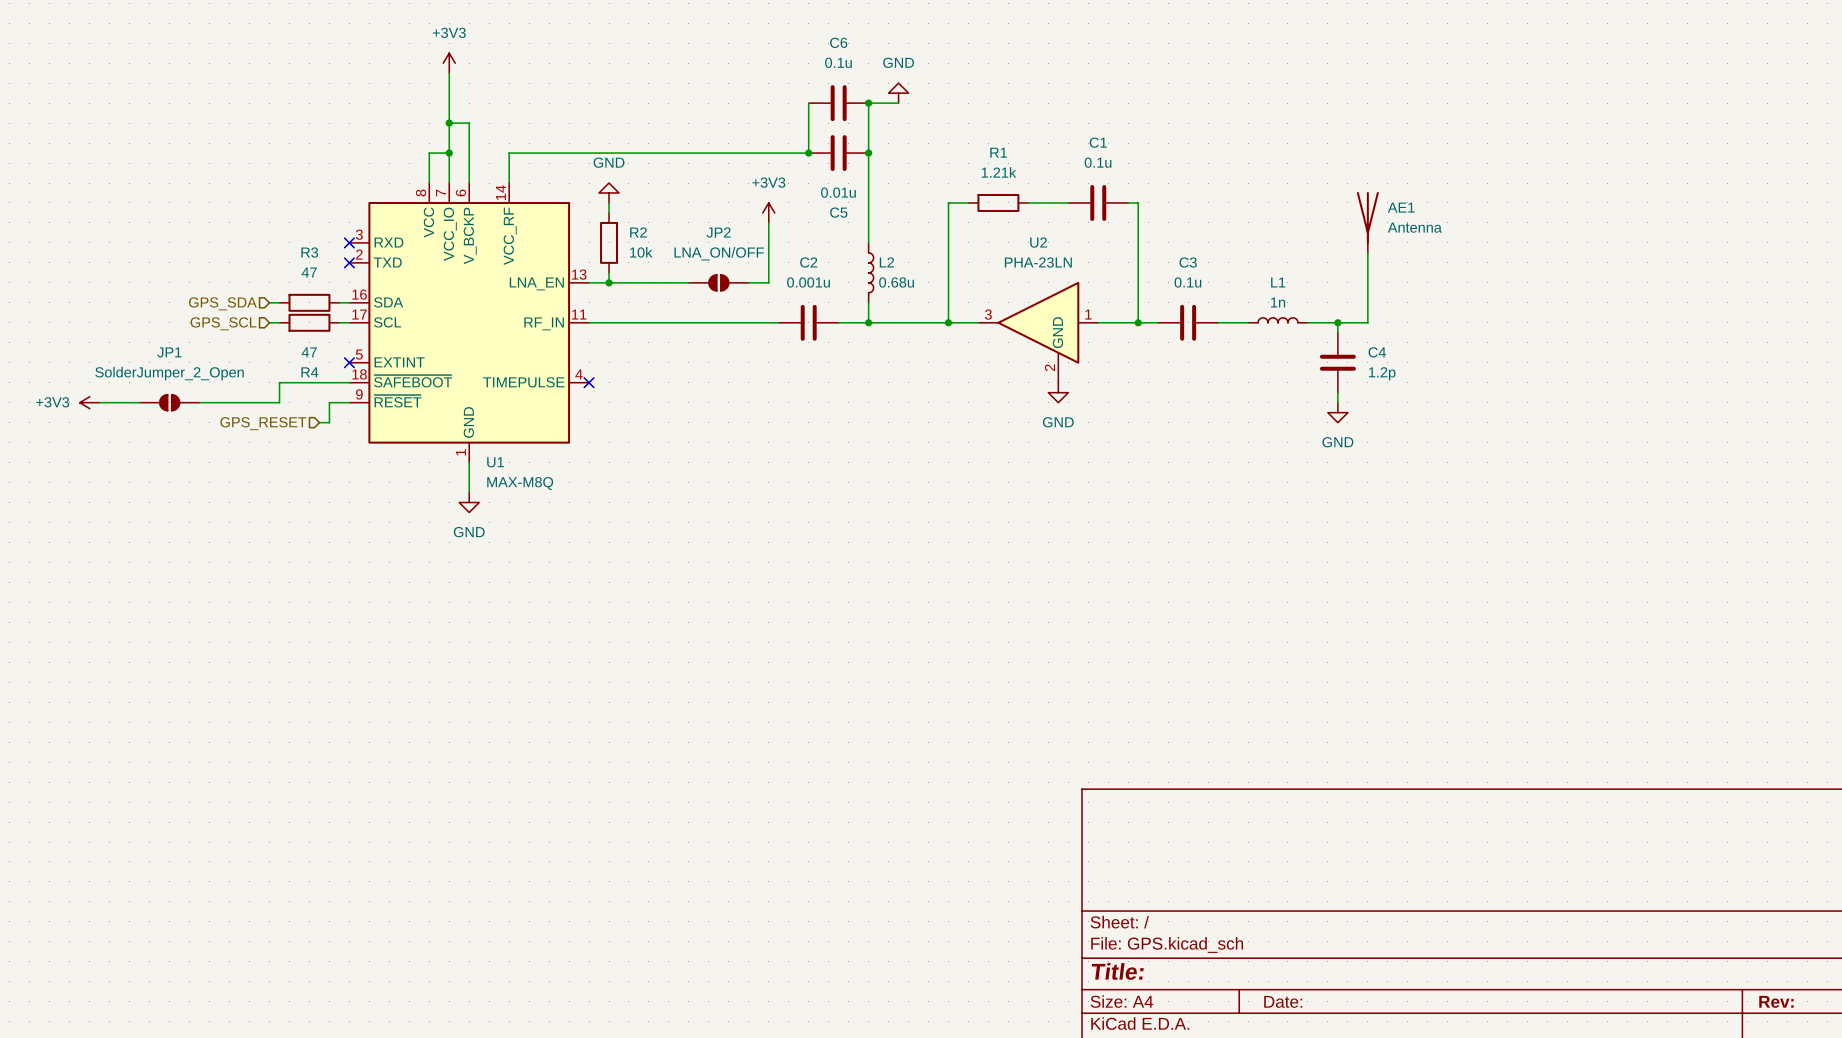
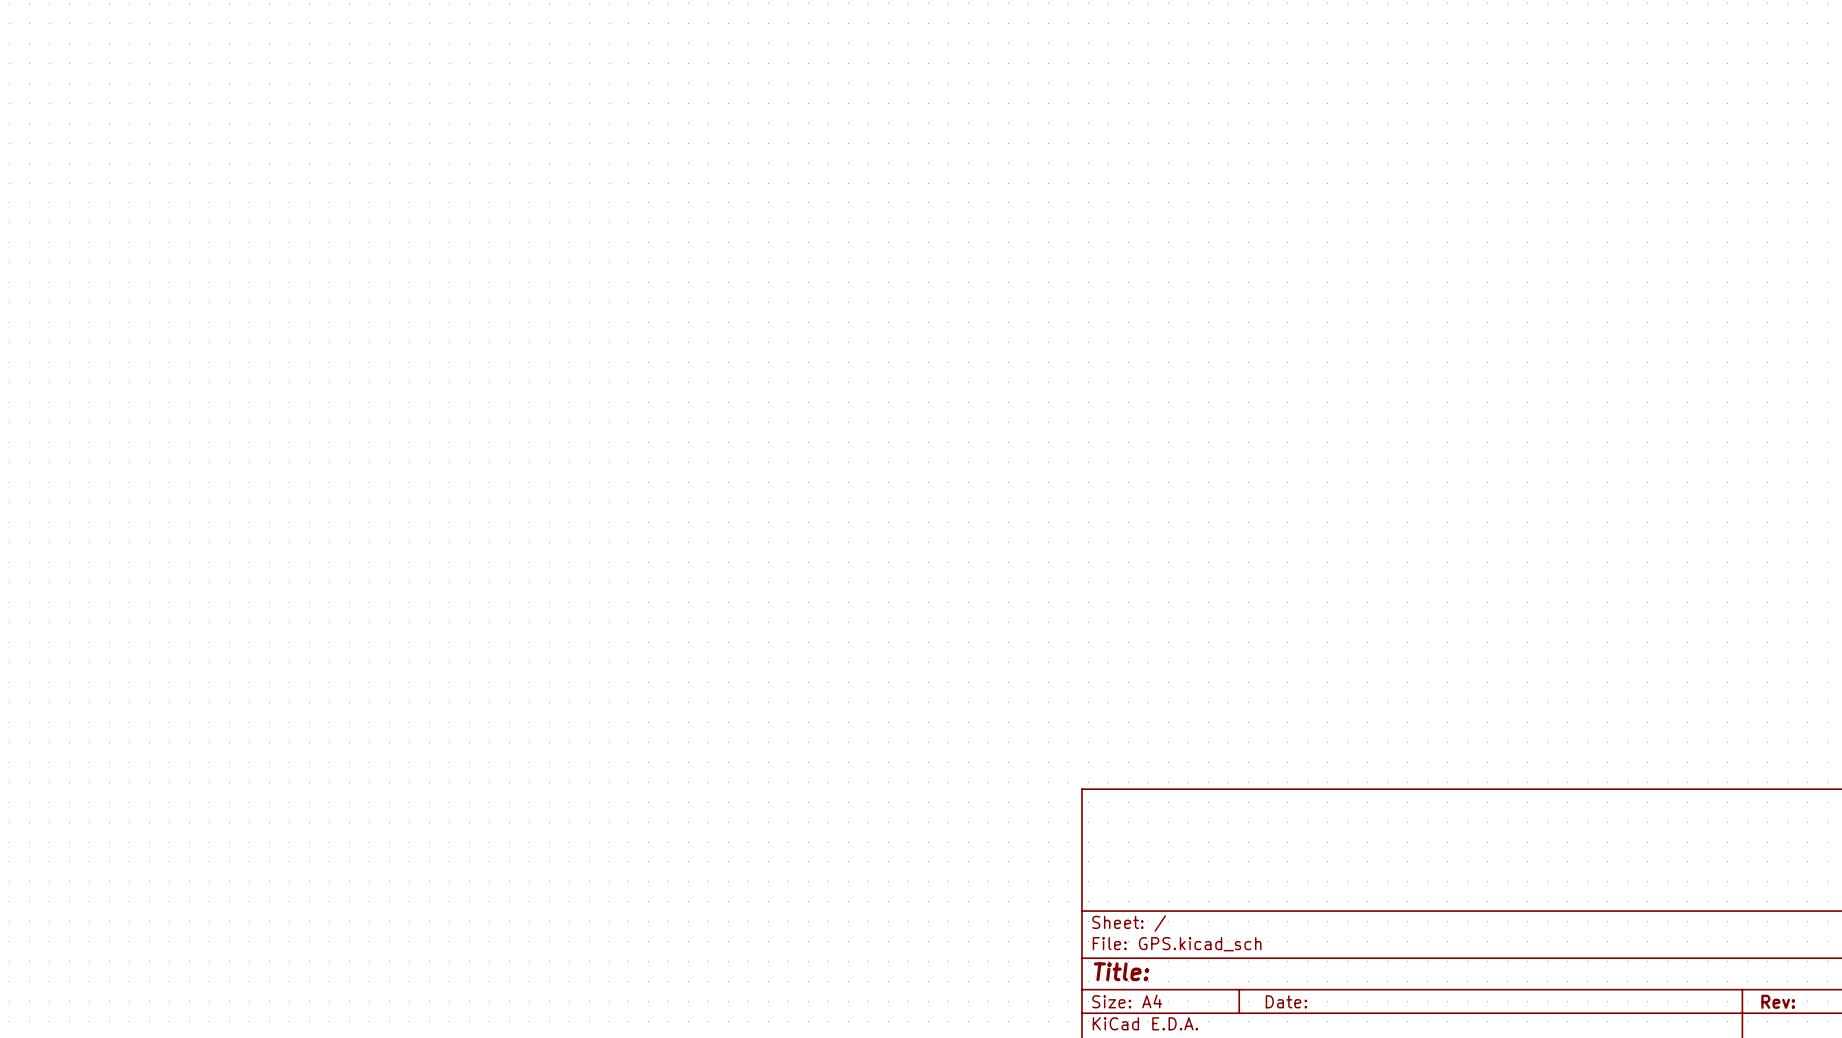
power symbol: +3V3 (449, 63) -> none
wire: (449, 73) (449, 183) -> none
power symbol: GND (898, 93) -> none
wire: (808, 103) (808, 153) (509, 153) (509, 183) -> none
C6: 0.1u (838, 103) -> none
junction: (868, 103) -> none
wire: (898, 103) (868, 103) (868, 242) -> none
wire: (449, 123) (469, 123) (469, 183) -> none
junction: (449, 123) -> none
wire: (449, 153) (429, 153) (429, 183) -> none
junction: (449, 153) -> none
junction: (808, 153) -> none
C5: 0.01u (838, 153) -> none
junction: (868, 153) -> none
power symbol: GND (609, 192) -> none
wire: (609, 202) (609, 212) -> none
wire: (968, 202) (948, 202) (948, 322) -> none
R1: 1.21k (998, 202) -> none
wire: (1028, 202) (1068, 202) -> none
C1: 0.1u (1098, 202) -> none
wire: (1128, 202) (1138, 202) (1138, 322) -> none
power symbol: +3V3 (768, 212) -> none
wire: (768, 222) (768, 282) (748, 282) -> none
AE1: Antenna (1367, 222) -> none
no-connect mark: (349, 242) -> none
R2: 10k (609, 242) -> none
wire: (1367, 252) (1367, 322) (1307, 322) -> none
no-connect mark: (349, 262) -> none
wire: (609, 272) (609, 282) -> none
L2: 0.68u (871, 272) -> none
wire: (589, 282) (688, 282) -> none
junction: (609, 282) -> none
JP2: LNA_ON/OFF (718, 282) -> none
wire: (269, 302) (279, 302) -> none
R3: 47 (309, 302) -> none
wire: (339, 302) (349, 302) -> none
wire: (868, 302) (868, 322) -> none
hierarchical label: GPS_SDA (222, 303) -> none
L1: 1n (1277, 320) -> none
wire: (269, 322) (279, 322) -> none
R4: 47 (309, 322) -> none
wire: (339, 322) (349, 322) -> none
U1: MAX-M8Q (469, 322) -> none
wire: (589, 322) (778, 322) -> none
C2: 0.001u (808, 322) -> none
wire: (838, 322) (978, 322) -> none
junction: (868, 322) -> none
junction: (948, 322) -> none
wire: (1098, 322) (1158, 322) -> none
junction: (1138, 322) -> none
C3: 0.1u (1188, 322) -> none
wire: (1218, 322) (1248, 322) -> none
wire: (1337, 322) (1337, 332) -> none
junction: (1337, 322) -> none
hierarchical label: GPS_SCL (223, 323) -> none
U2: PHA-23LN (1038, 332) -> none
no-connect mark: (349, 362) -> none
C4: 1.2p (1337, 362) -> none
wire: (349, 382) (279, 382) (279, 402) (199, 402) -> none
no-connect mark: (589, 382) -> none
power symbol: GND (1058, 392) -> none
wire: (1337, 392) (1337, 402) -> none
power symbol: +3V3 (89, 402) -> none
wire: (99, 402) (139, 402) -> none
JP1: SolderJumper_2_Open (169, 402) -> none
wire: (349, 402) (329, 402) (329, 422) (319, 422) -> none
power symbol: GND (1337, 412) -> none
hierarchical label: GPS_RESET (263, 423) -> none
wire: (469, 462) (469, 492) -> none
power symbol: GND (469, 502) -> none

